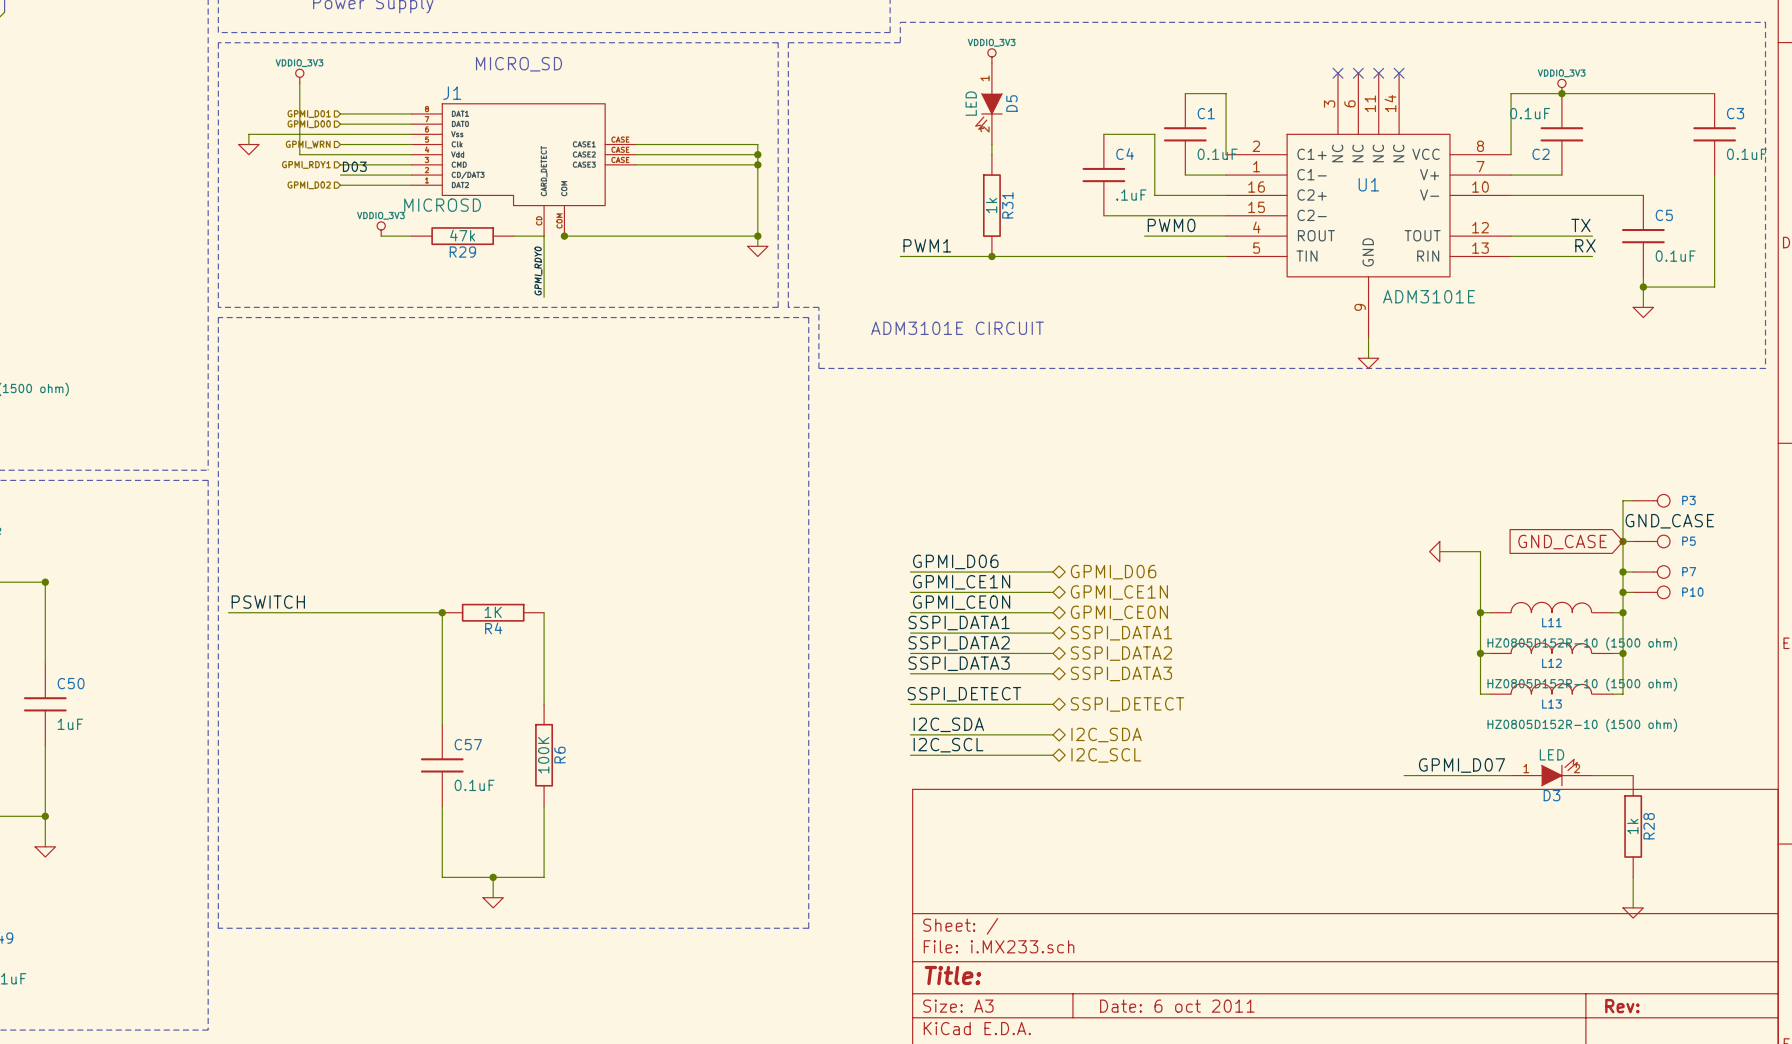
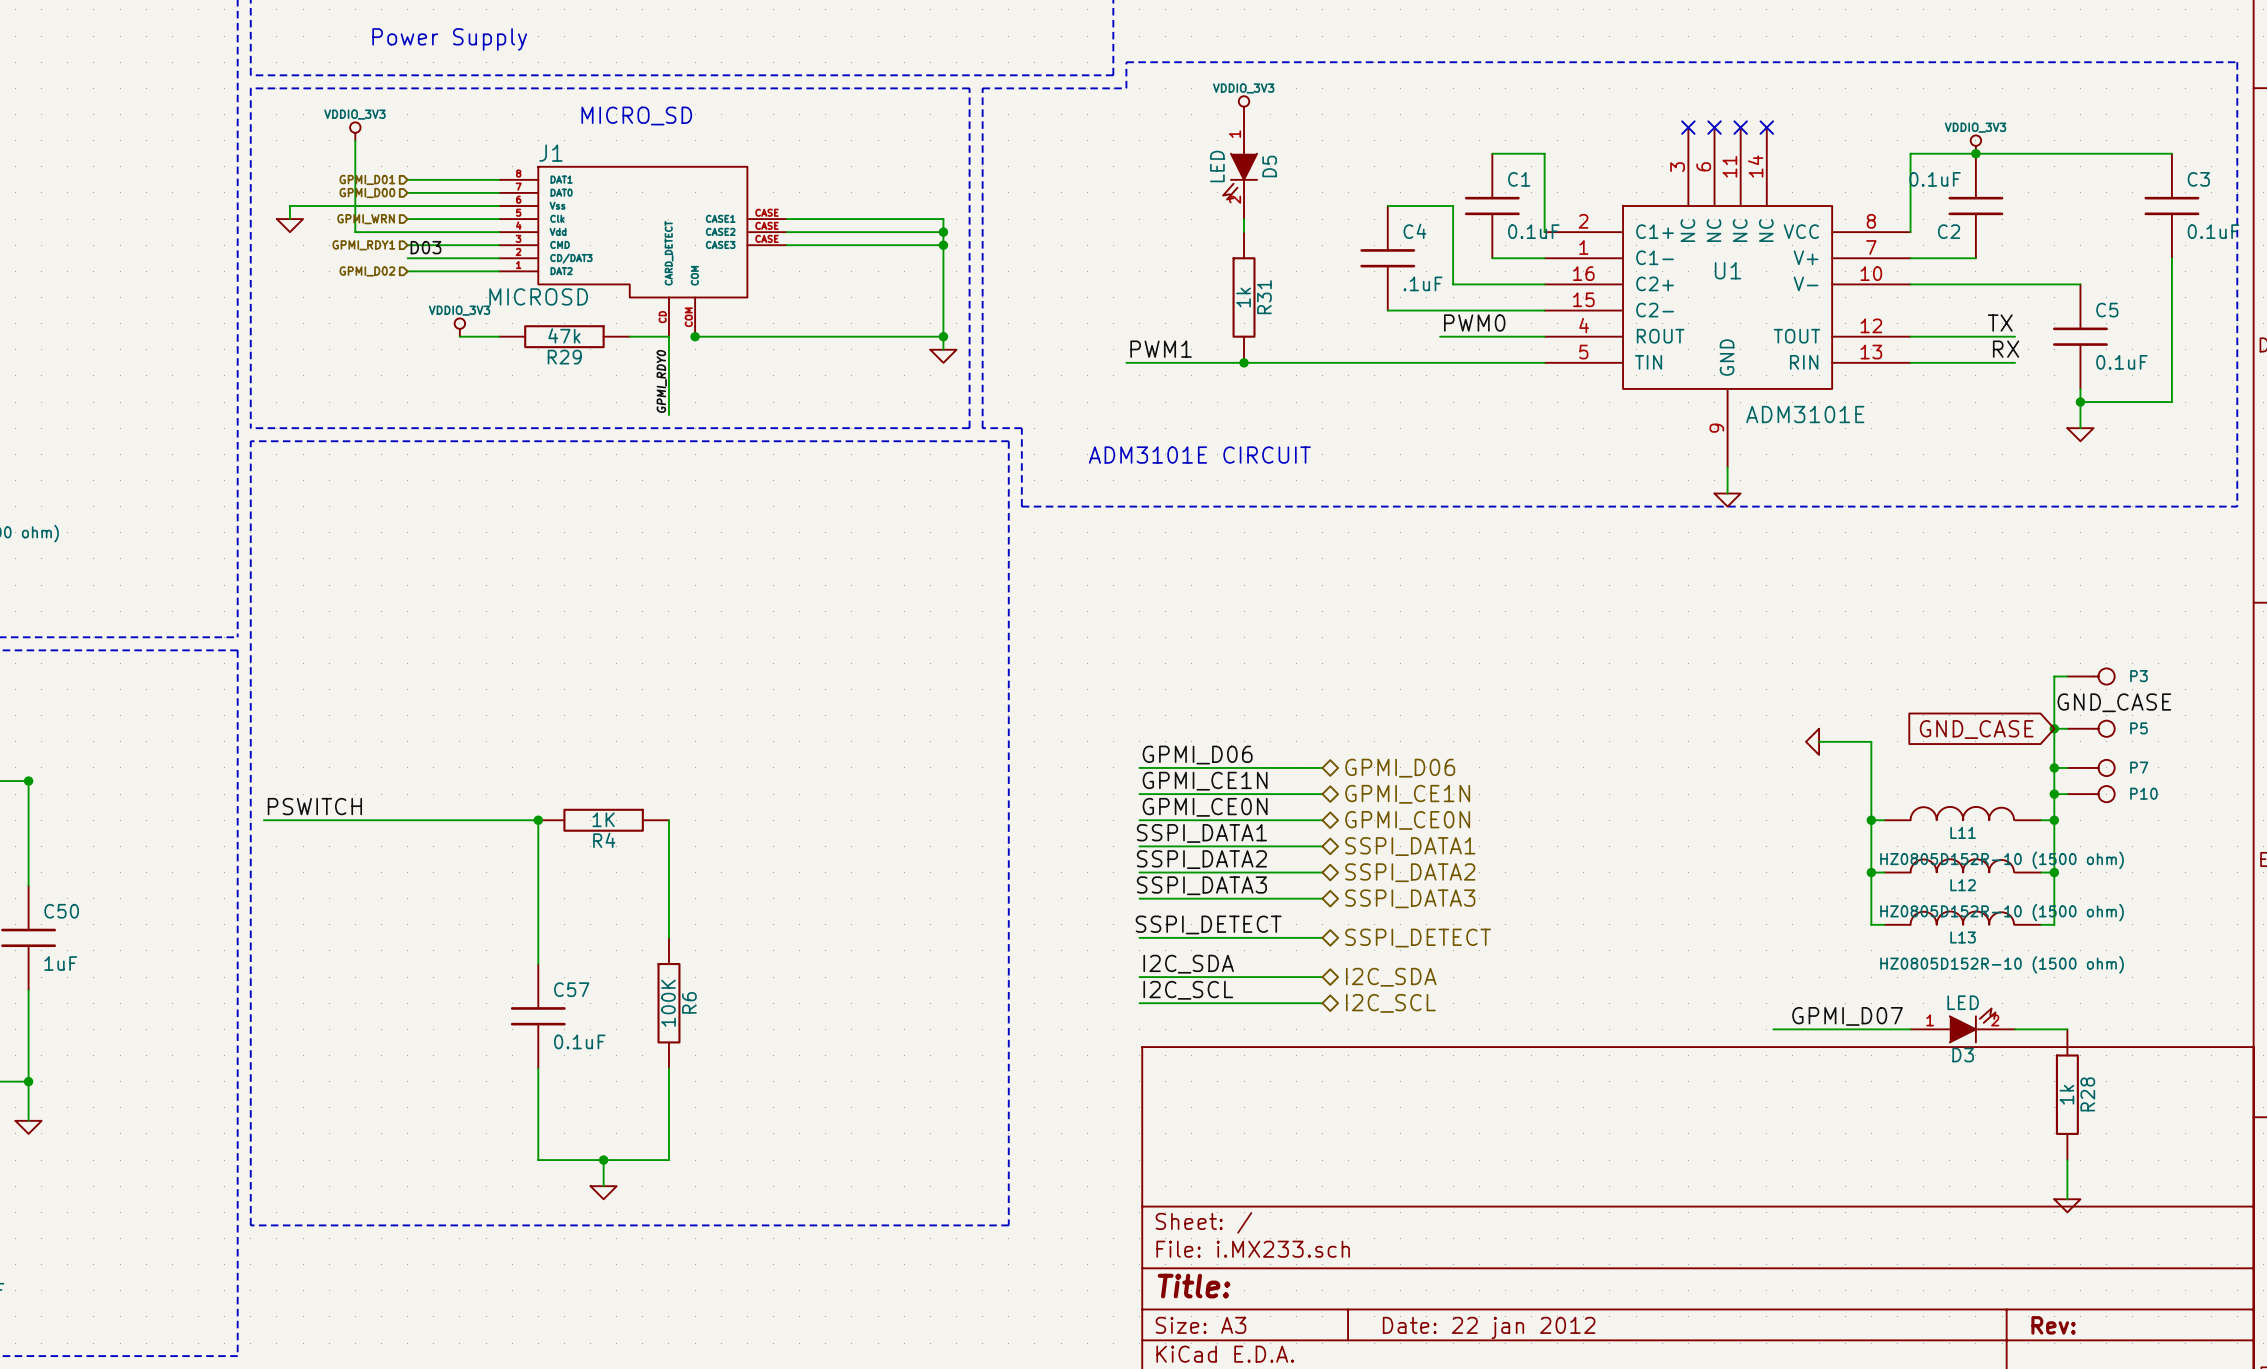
title block: Date: 6 oct 2011 (1177, 1006) -> Date: 22 jan 2012 (1489, 1327)

